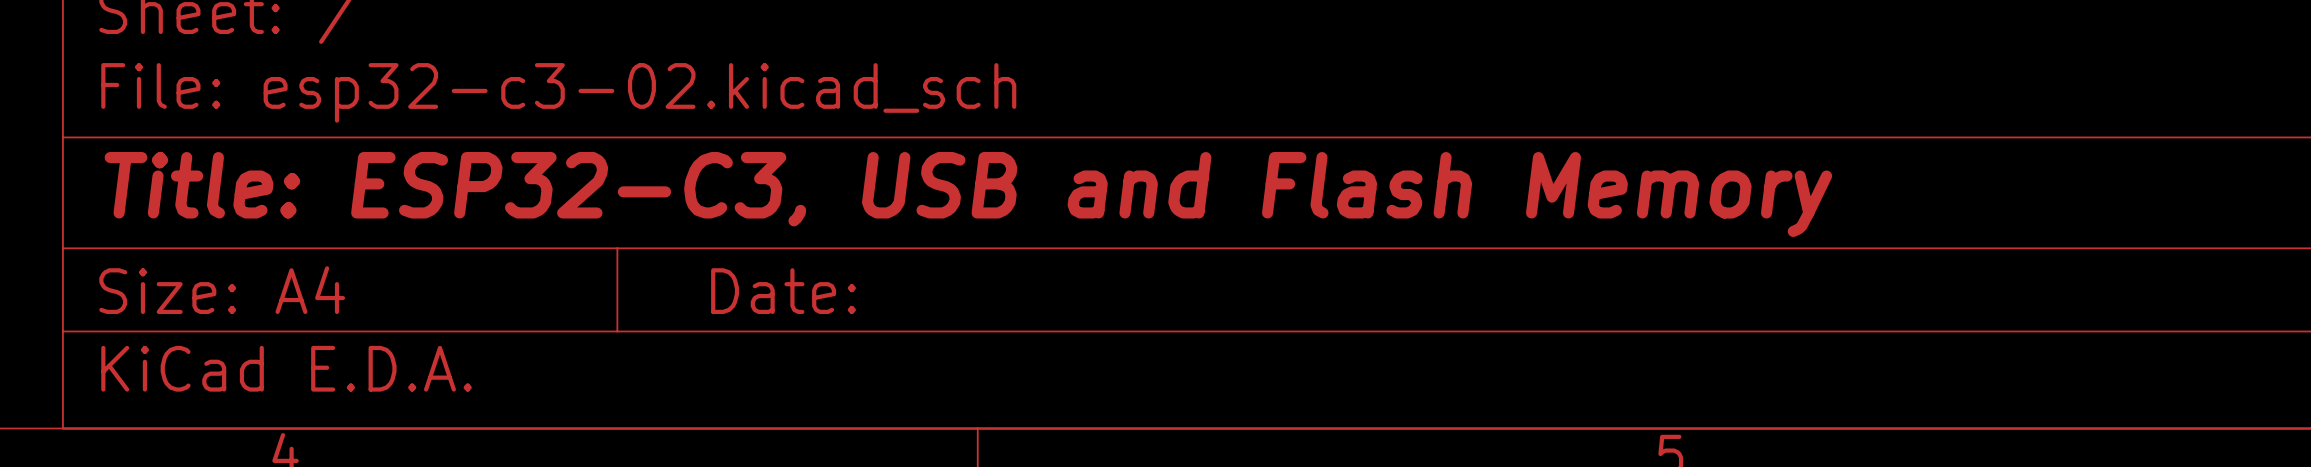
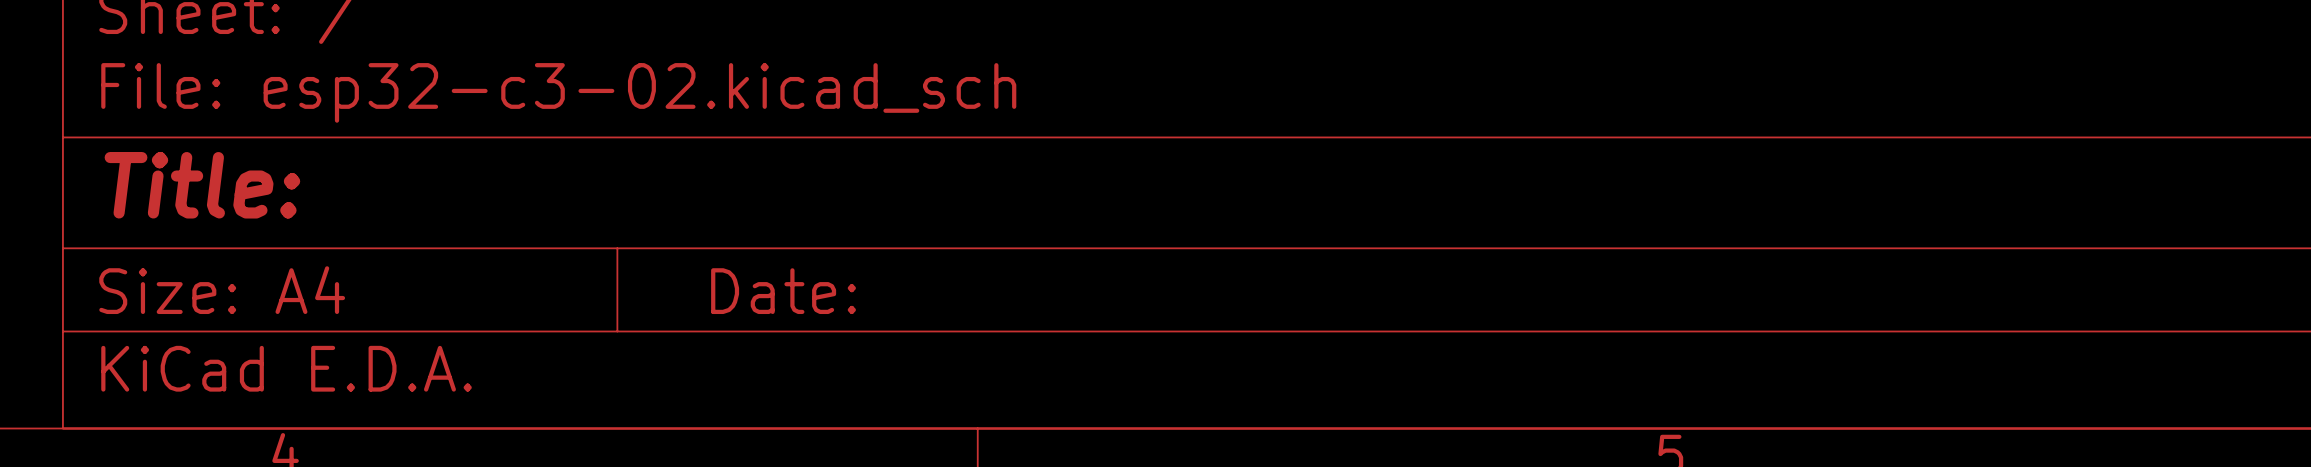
title block: Title: ESP32-C3, USB and Flash Memory (968, 194) -> Title: (202, 185)

